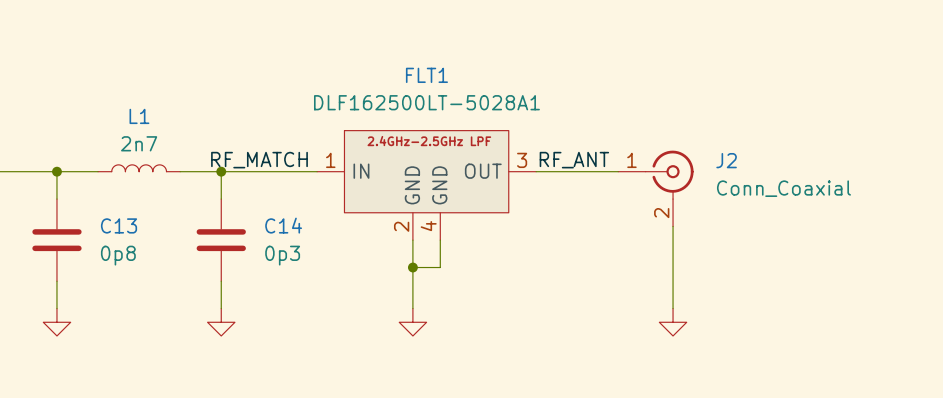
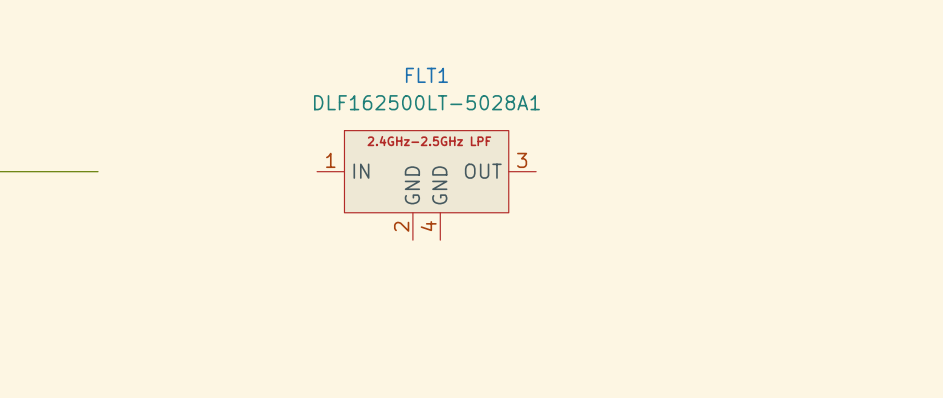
label: RF_MATCH (259, 160) -> none
label: RF_ANT (574, 160) -> none
L1: 2n7 (139, 168) -> none
wire: (56, 171) (56, 199) -> none
junction: (56, 171) -> none
wire: (180, 171) (317, 171) -> none
wire: (221, 171) (221, 199) -> none
junction: (221, 171) -> none
wire: (536, 171) (618, 171) -> none
J2: Conn_Coaxial (655, 188) -> none
wire: (673, 226) (673, 308) -> none
C13: 0p8 (56, 240) -> none
C14: 0p3 (221, 240) -> none
wire: (412, 240) (412, 308) -> none
wire: (440, 240) (440, 267) (412, 267) -> none
junction: (412, 267) -> none
wire: (56, 281) (56, 308) -> none
wire: (221, 281) (221, 308) -> none
power symbol: (56, 322) -> none
power symbol: (221, 322) -> none
power symbol: (412, 322) -> none
power symbol: (673, 322) -> none

